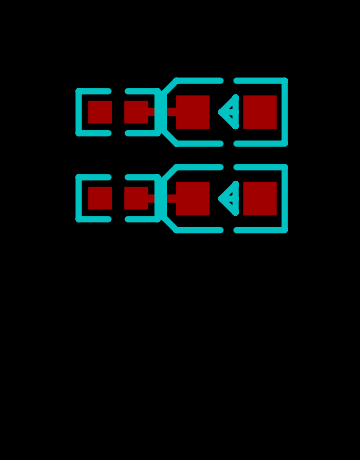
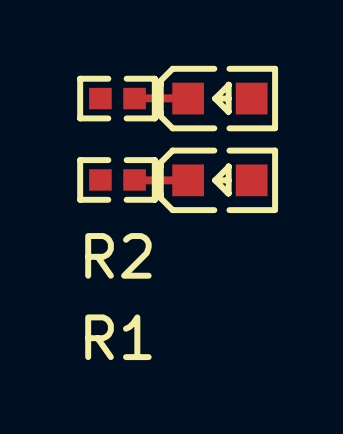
R2 name: none -> R2 (118, 255)
R1 name: none -> R1 (118, 337)

